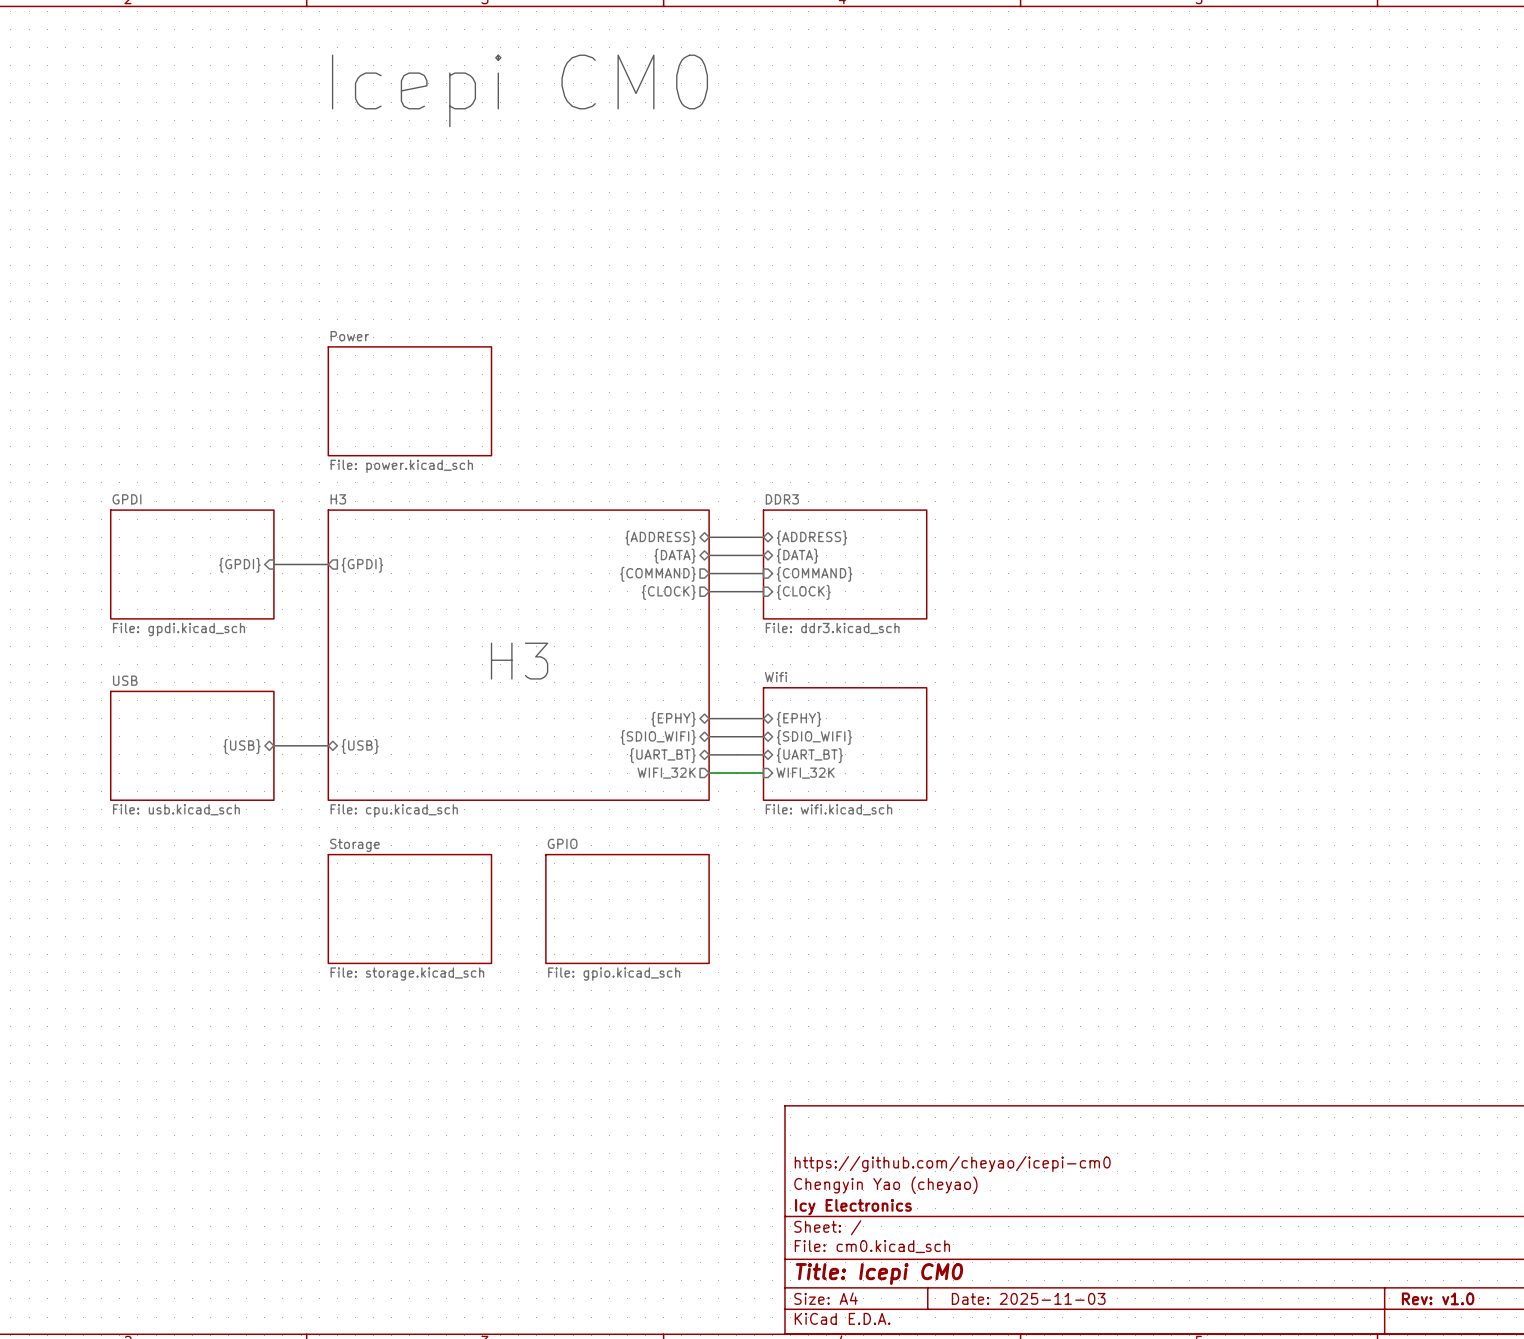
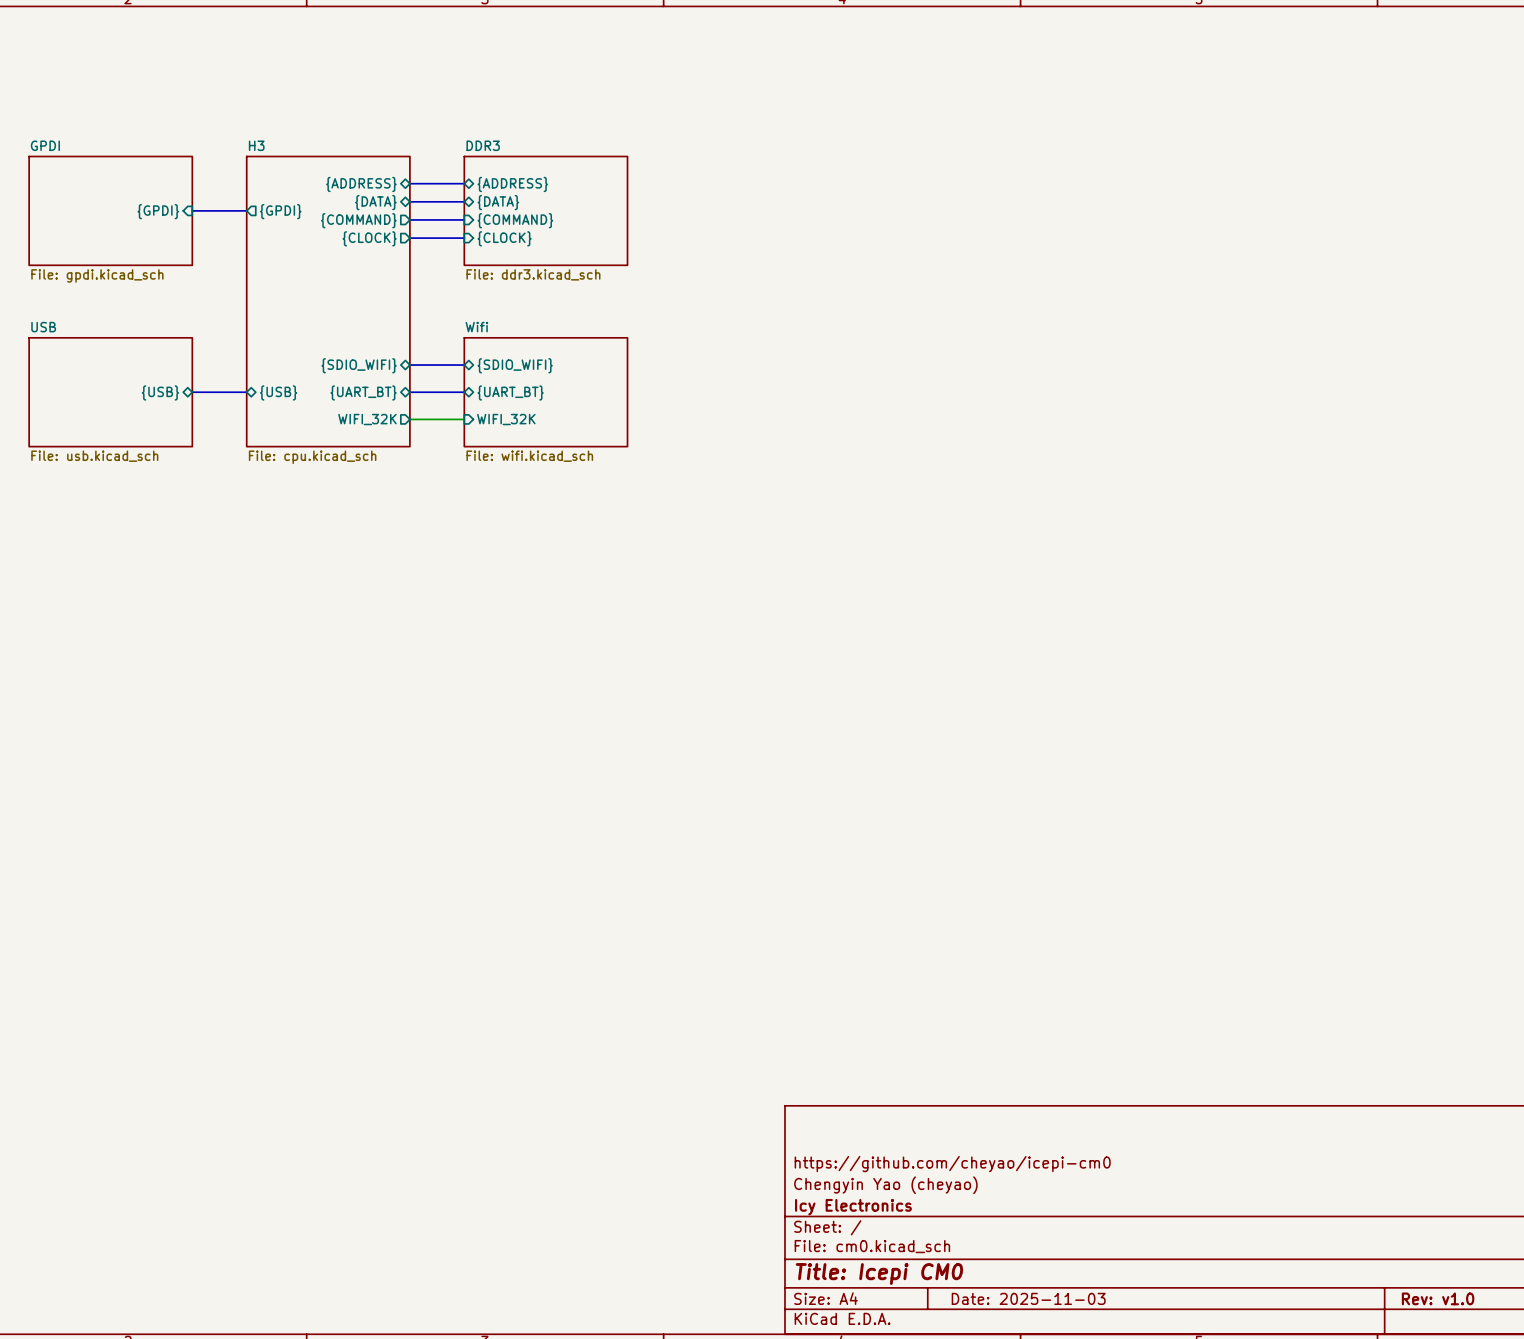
text: Icepi CM0 (519, 90) -> none
bus: none -> (409, 183) (464, 183)
sheet pin: none -> {ADDRESS} (361, 184)
sheet pin: none -> {ADDRESS} (512, 184)
bus: none -> (409, 201) (464, 201)
sheet pin: none -> {DATA} (375, 202)
sheet pin: none -> {DATA} (498, 202)
sheet GPDI: none -> File: gpdi.kicad_sch (110, 210)
bus: none -> (192, 210) (246, 210)
sheet pin: none -> {GPDI} (158, 211)
sheet pin: none -> {GPDI} (280, 211)
bus: none -> (409, 219) (464, 219)
sheet pin: none -> {COMMAND} (358, 220)
sheet pin: none -> {COMMAND} (515, 220)
sheet pin: none -> {CLOCK} (369, 238)
bus: none -> (409, 238) (464, 238)
sheet pin: none -> {CLOCK} (504, 238)
sheet pin: none -> {SDIO_WIFI} (359, 365)
bus: none -> (409, 365) (464, 365)
sheet pin: none -> {SDIO_WIFI} (515, 365)
sheet USB: none -> File: usb.kicad_sch (110, 392)
sheet pin: none -> {USB} (160, 392)
bus: none -> (192, 392) (246, 392)
sheet pin: none -> {USB} (278, 392)
sheet pin: none -> {UART_BT} (363, 392)
bus: none -> (409, 392) (464, 392)
sheet pin: none -> {UART_BT} (510, 392)
sheet Wifi: none -> File: wifi.kicad_sch (545, 392)
sheet Power: File: power.kicad_sch (409, 401) -> none
sheet pin: none -> WIFI_32K (367, 419)
wire: none -> (409, 419) (464, 419)
sheet pin: none -> WIFI_32K (506, 419)
sheet H3 name position: H3 (338, 499) -> H3 (256, 145)
sheet H3 shape: [327, 509, 710, 801] -> [246, 155, 411, 448]
bus: (709, 537) (763, 537) -> none
sheet pin: {ADDRESS} (660, 538) -> none
sheet pin: {ADDRESS} (812, 538) -> none
bus: (709, 555) (763, 555) -> none
sheet pin: {DATA} (675, 556) -> none
sheet pin: {DATA} (797, 556) -> none
sheet GPDI: File: gpdi.kicad_sch (192, 564) -> none
bus: (273, 564) (328, 564) -> none
sheet DDR3 position: (845, 564) -> (545, 210)
sheet pin: {GPDI} (239, 565) -> none
sheet pin: {GPDI} (362, 565) -> none
bus: (709, 573) (763, 573) -> none
sheet pin: {COMMAND} (658, 574) -> none
sheet pin: {COMMAND} (814, 574) -> none
bus: (709, 591) (763, 591) -> none
sheet pin: {CLOCK} (668, 592) -> none
sheet pin: {CLOCK} (803, 592) -> none
text: H3 (519, 661) -> none
bus: (709, 718) (763, 718) -> none
sheet pin: {EPHY} (673, 719) -> none
sheet pin: {EPHY} (799, 719) -> none
bus: (709, 736) (763, 736) -> none
sheet pin: {SDIO_WIFI} (658, 737) -> none
sheet pin: {SDIO_WIFI} (814, 737) -> none
sheet Wifi: File: wifi.kicad_sch (845, 744) -> none
sheet USB: File: usb.kicad_sch (192, 745) -> none
bus: (273, 745) (328, 745) -> none
sheet pin: {USB} (242, 746) -> none
sheet pin: {USB} (360, 746) -> none
bus: (709, 754) (763, 754) -> none
sheet pin: {UART_BT} (662, 755) -> none
sheet pin: {UART_BT} (809, 755) -> none
sheet pin: WIFI_32K (666, 773) -> none
wire: (709, 773) (763, 773) -> none
sheet pin: WIFI_32K (805, 773) -> none
sheet H3 value position: File: cpu.kicad_sch (394, 810) -> File: cpu.kicad_sch (312, 457)
sheet Storage: File: storage.kicad_sch (409, 909) -> none
sheet GPIO: File: gpio.kicad_sch (627, 909) -> none

